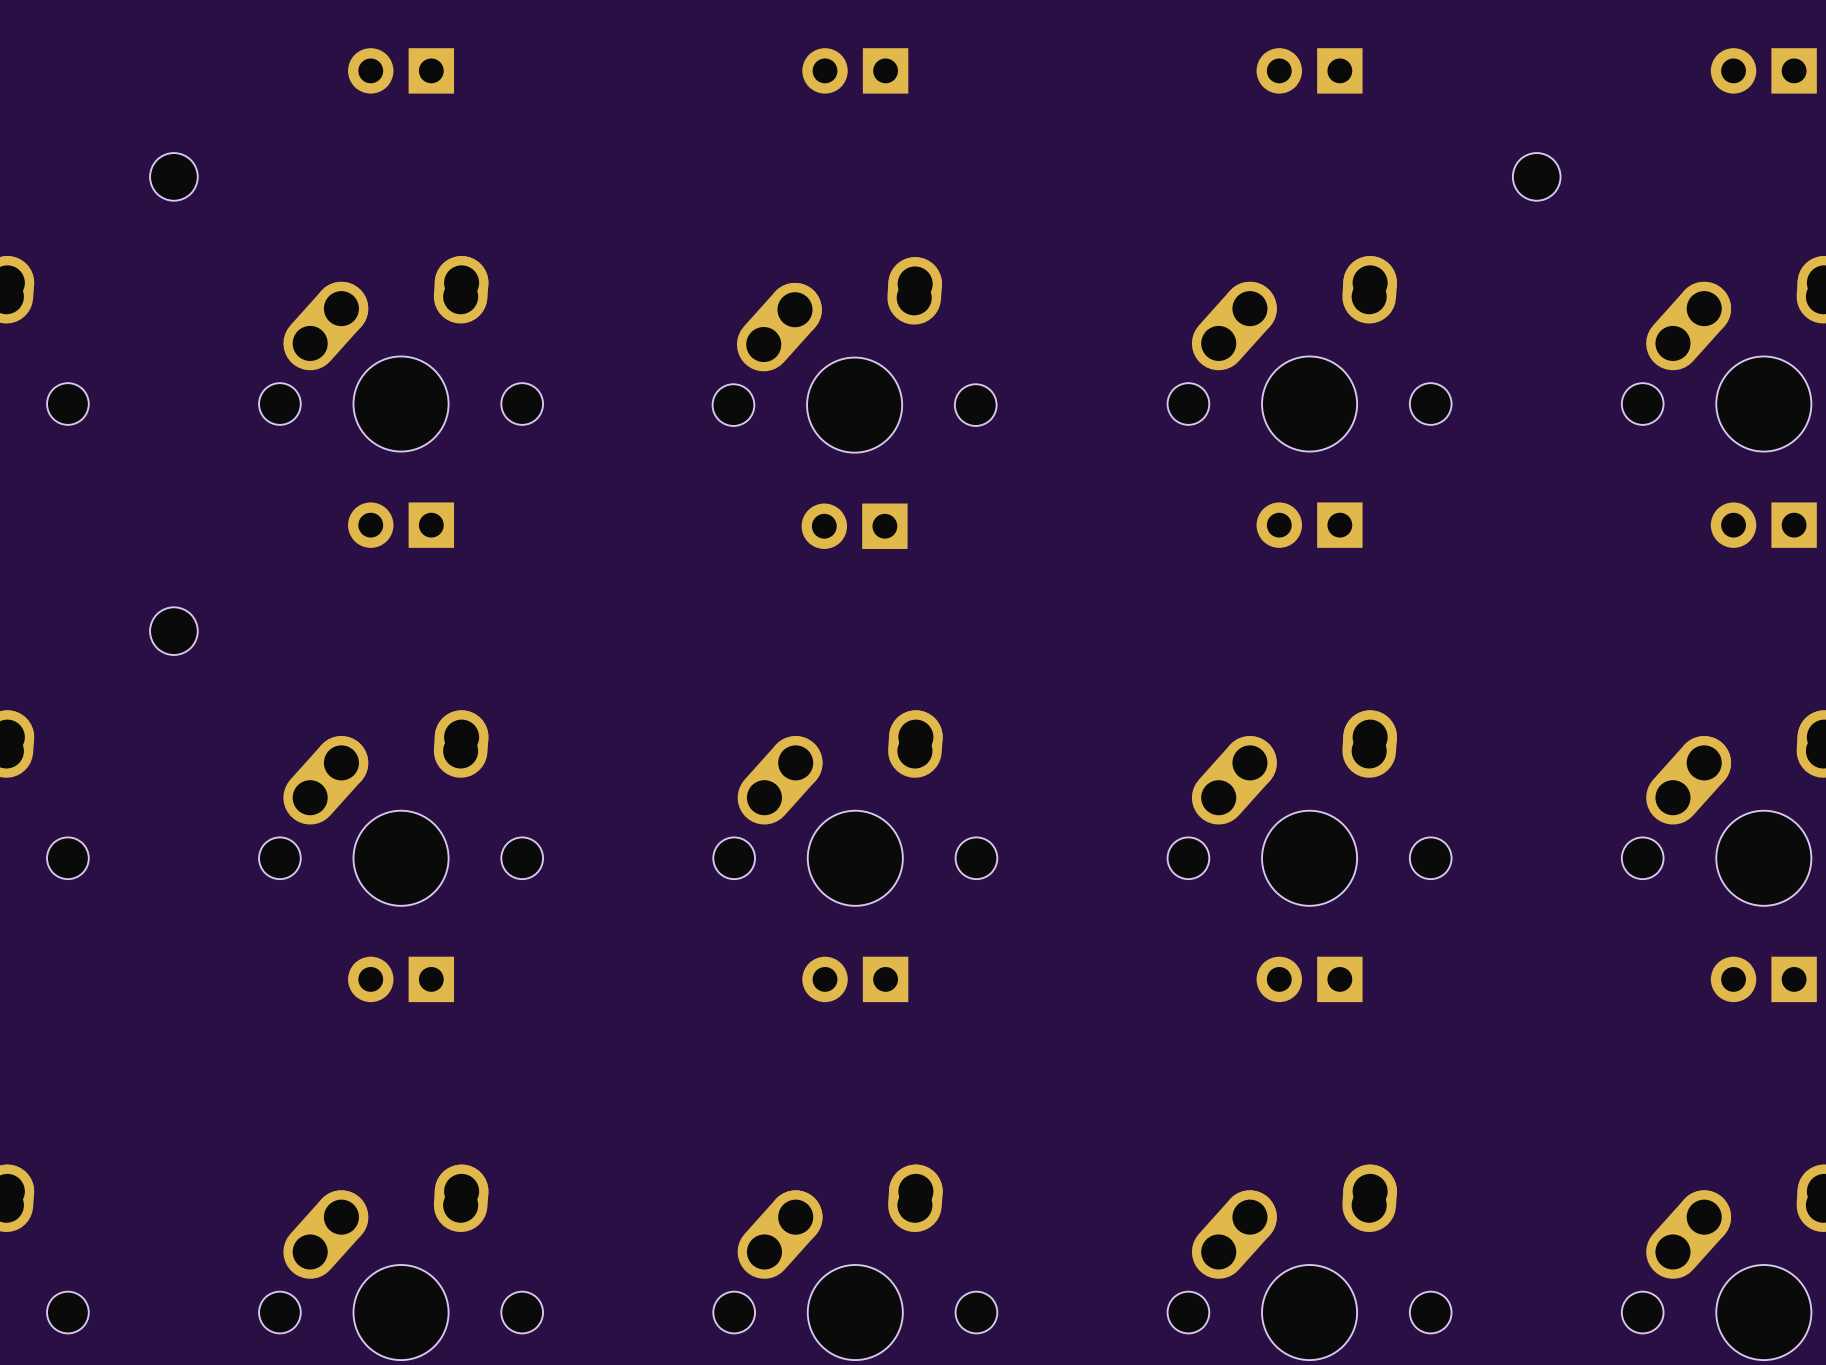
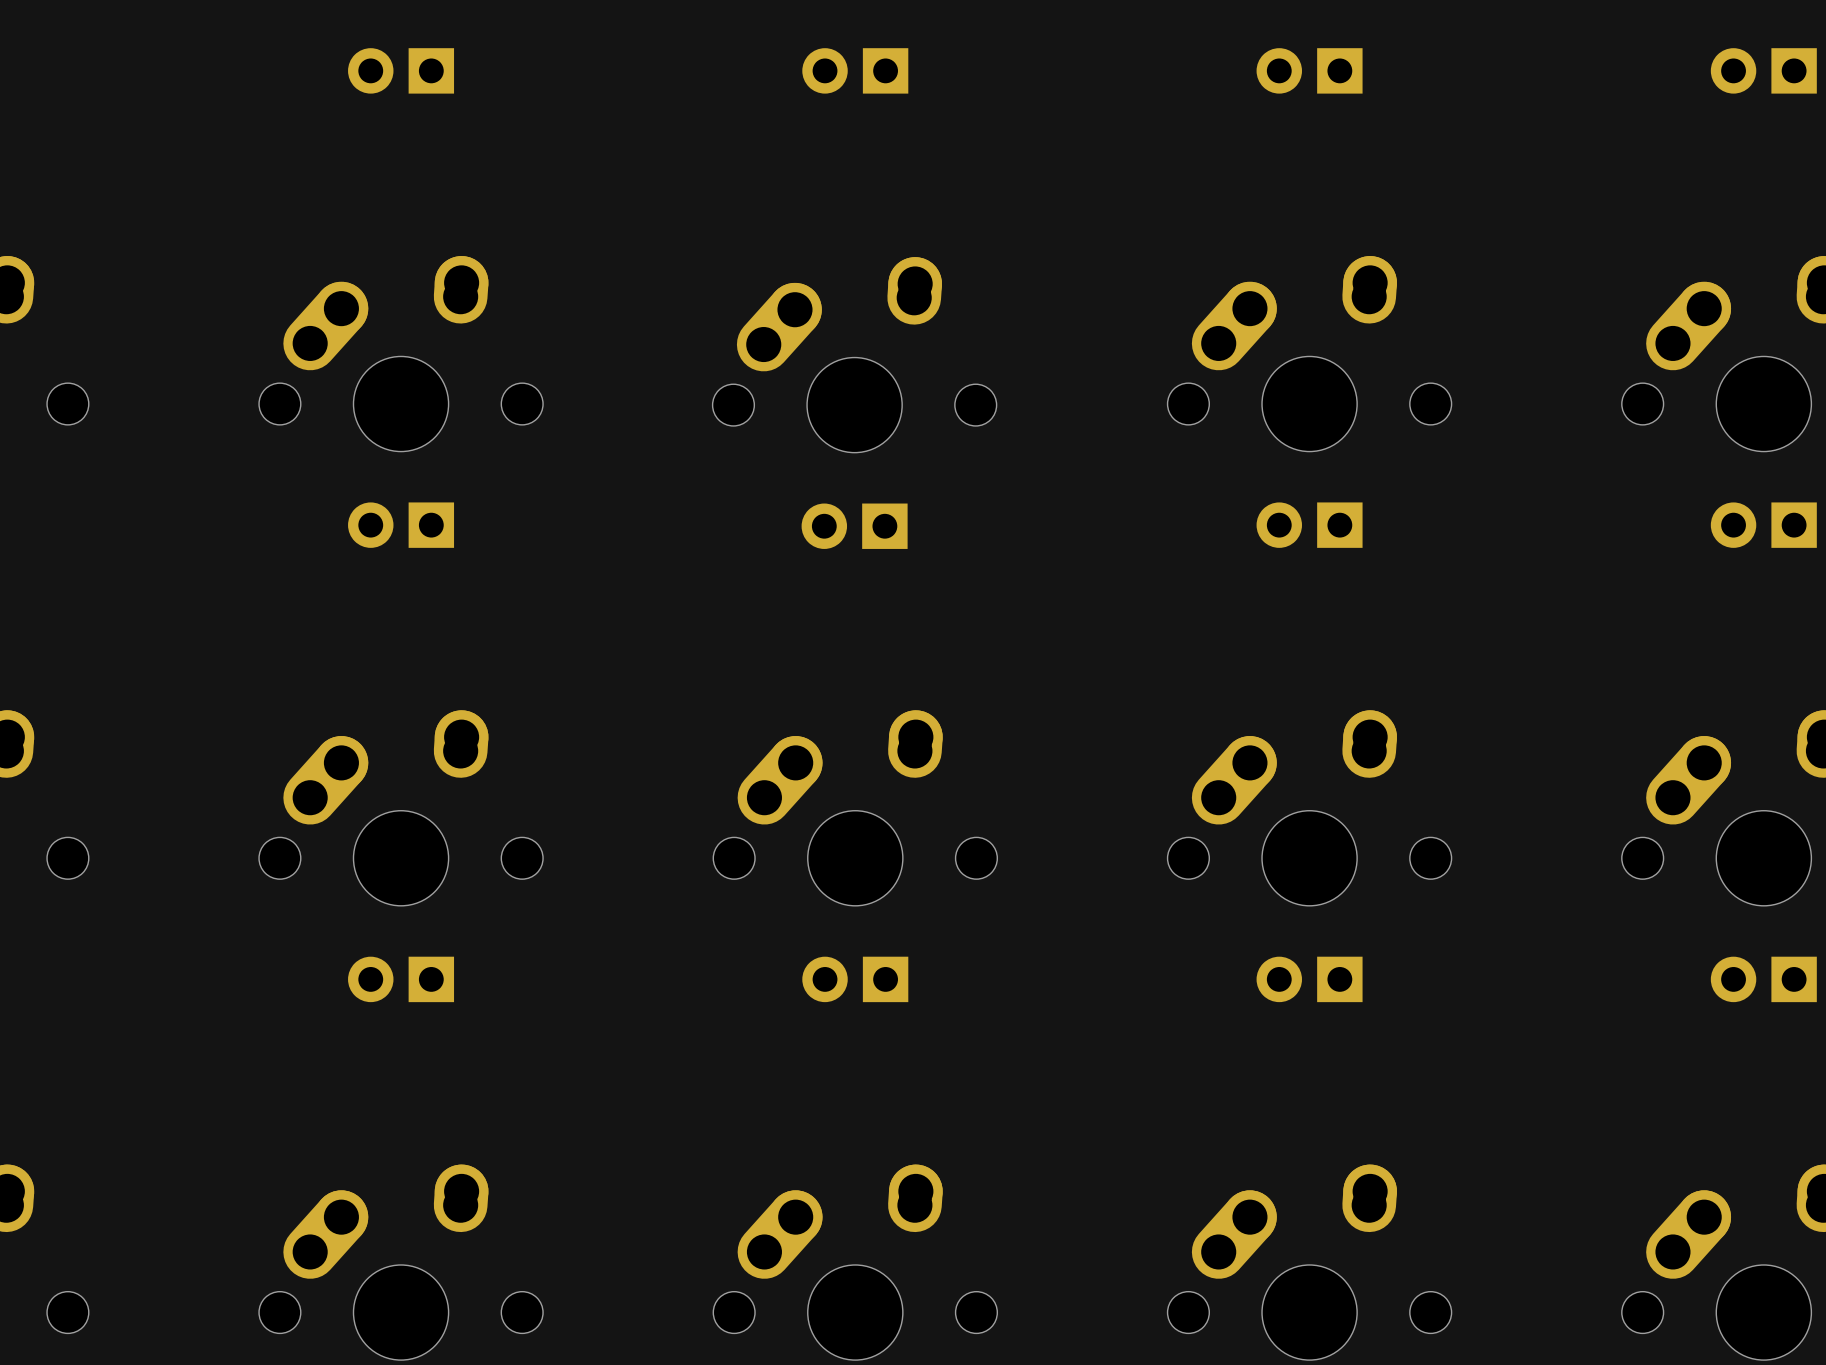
part: (173, 176) -> none
part: (1536, 176) -> none
part: (173, 631) -> none

